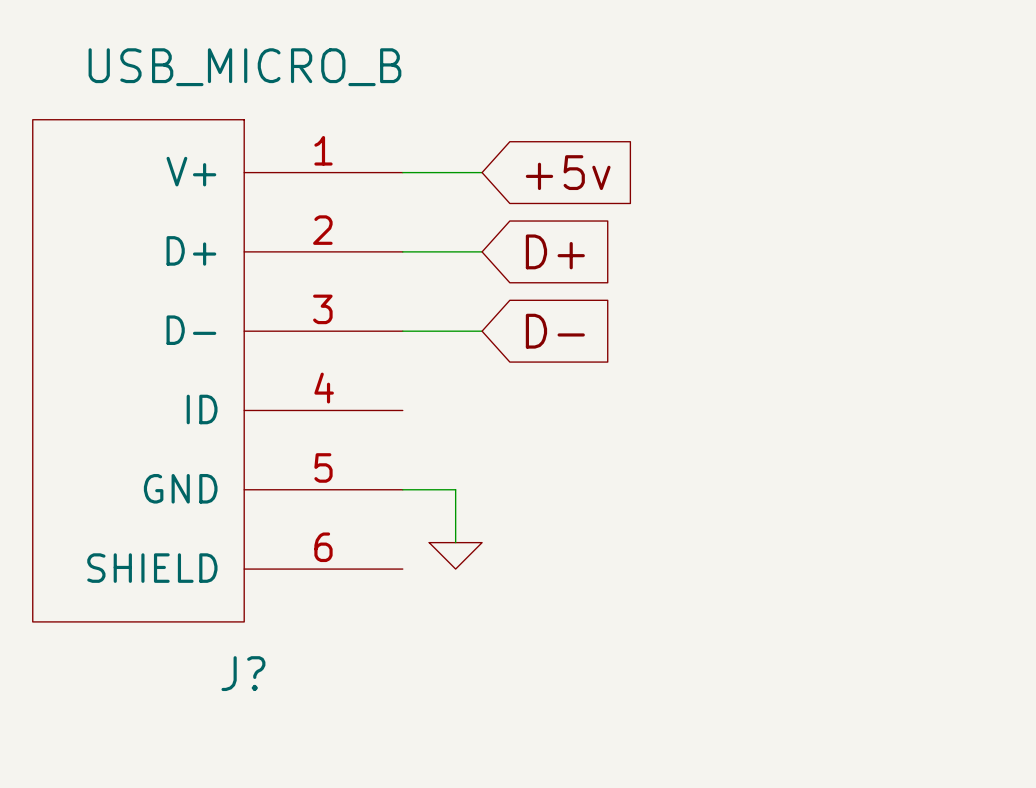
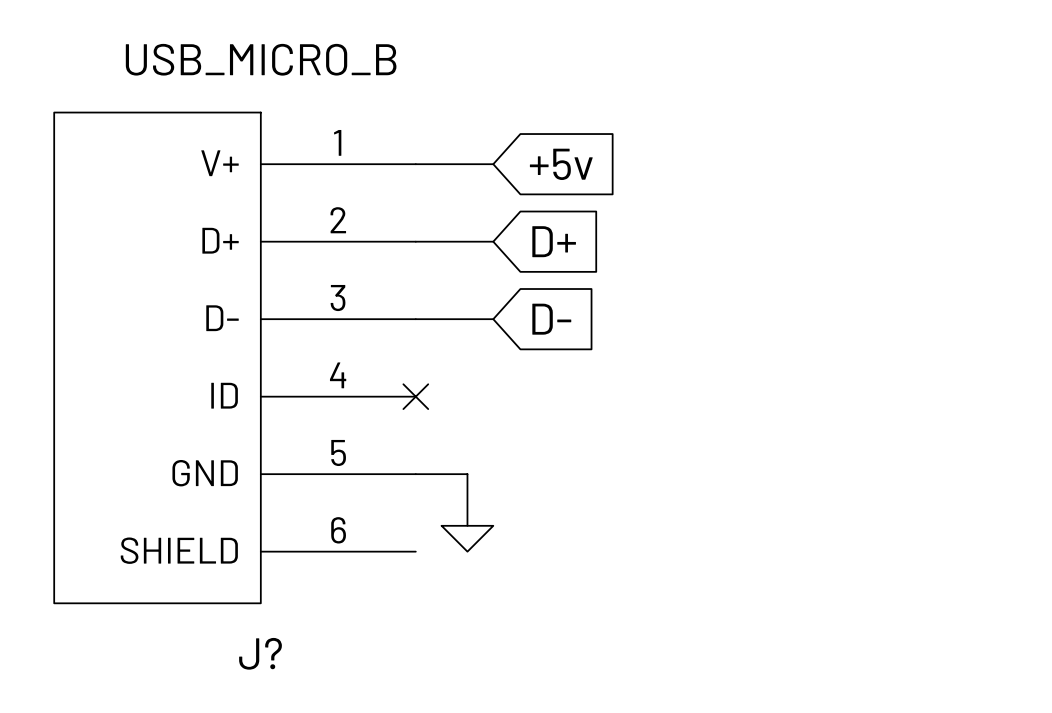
no-connect mark: none -> (415, 396)

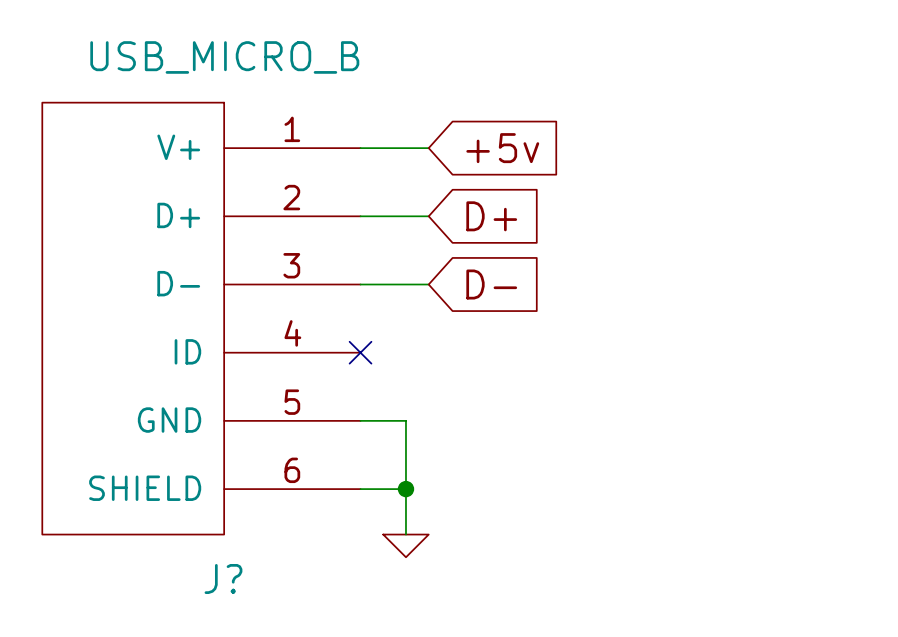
wire: none -> (405, 466) (405, 534)
power symbol position: (467, 538) -> (405, 545)
wire: none -> (360, 489) (405, 489)
junction: none -> (405, 489)

